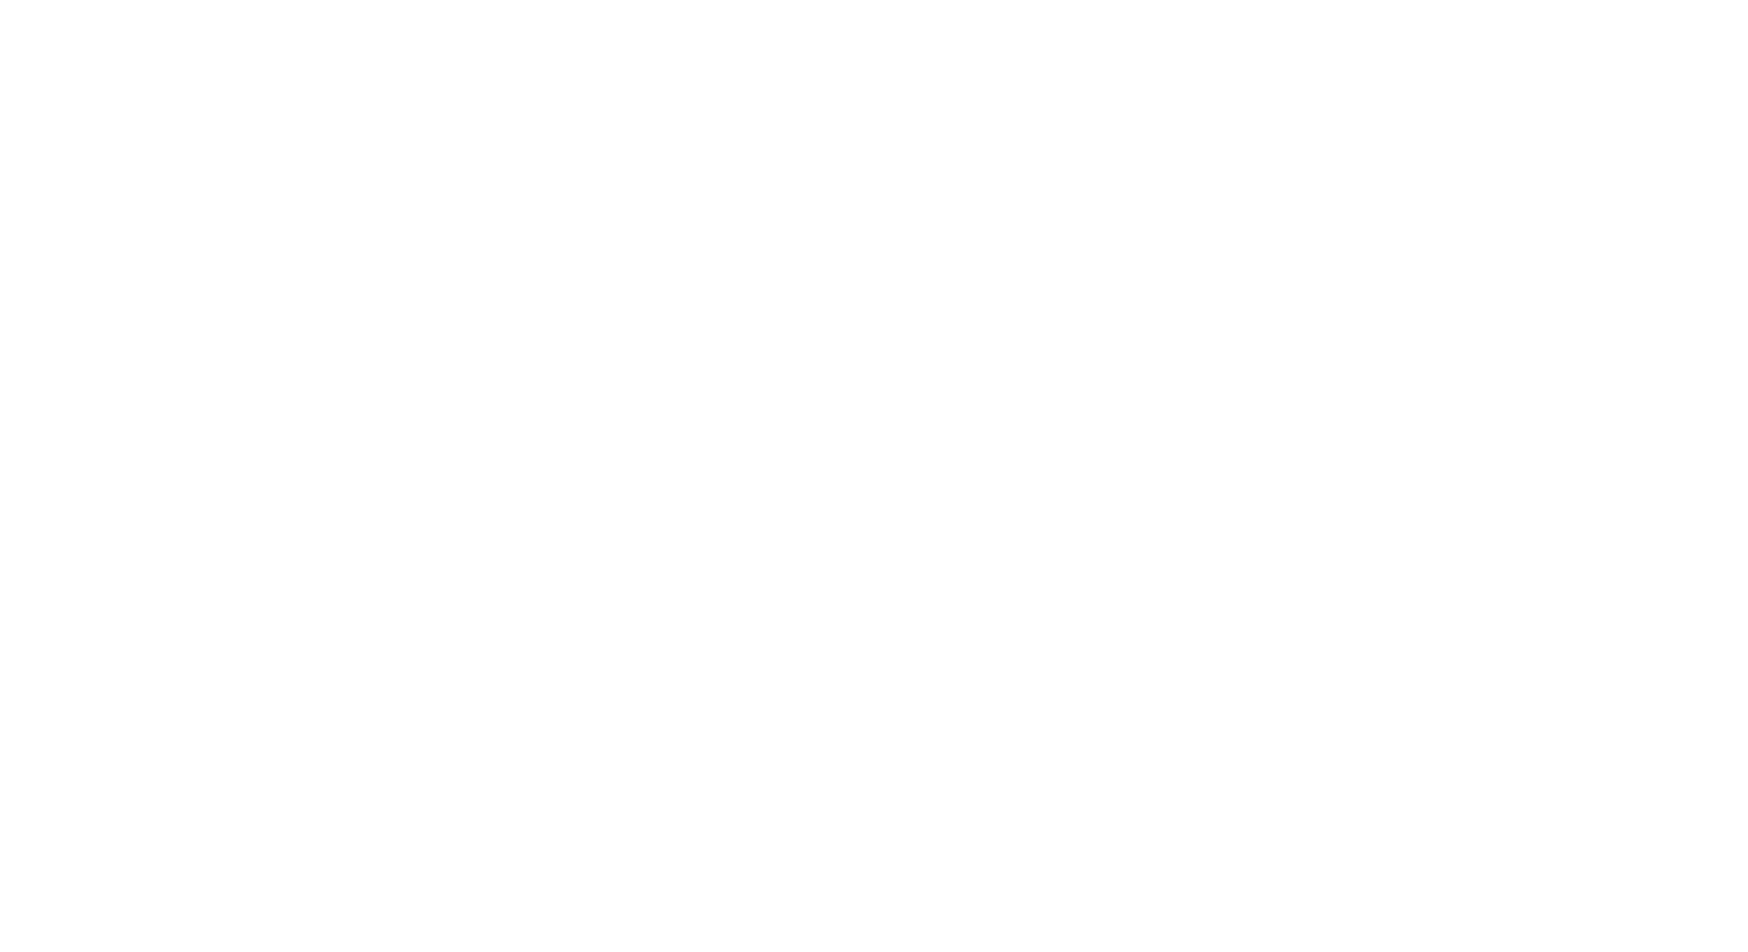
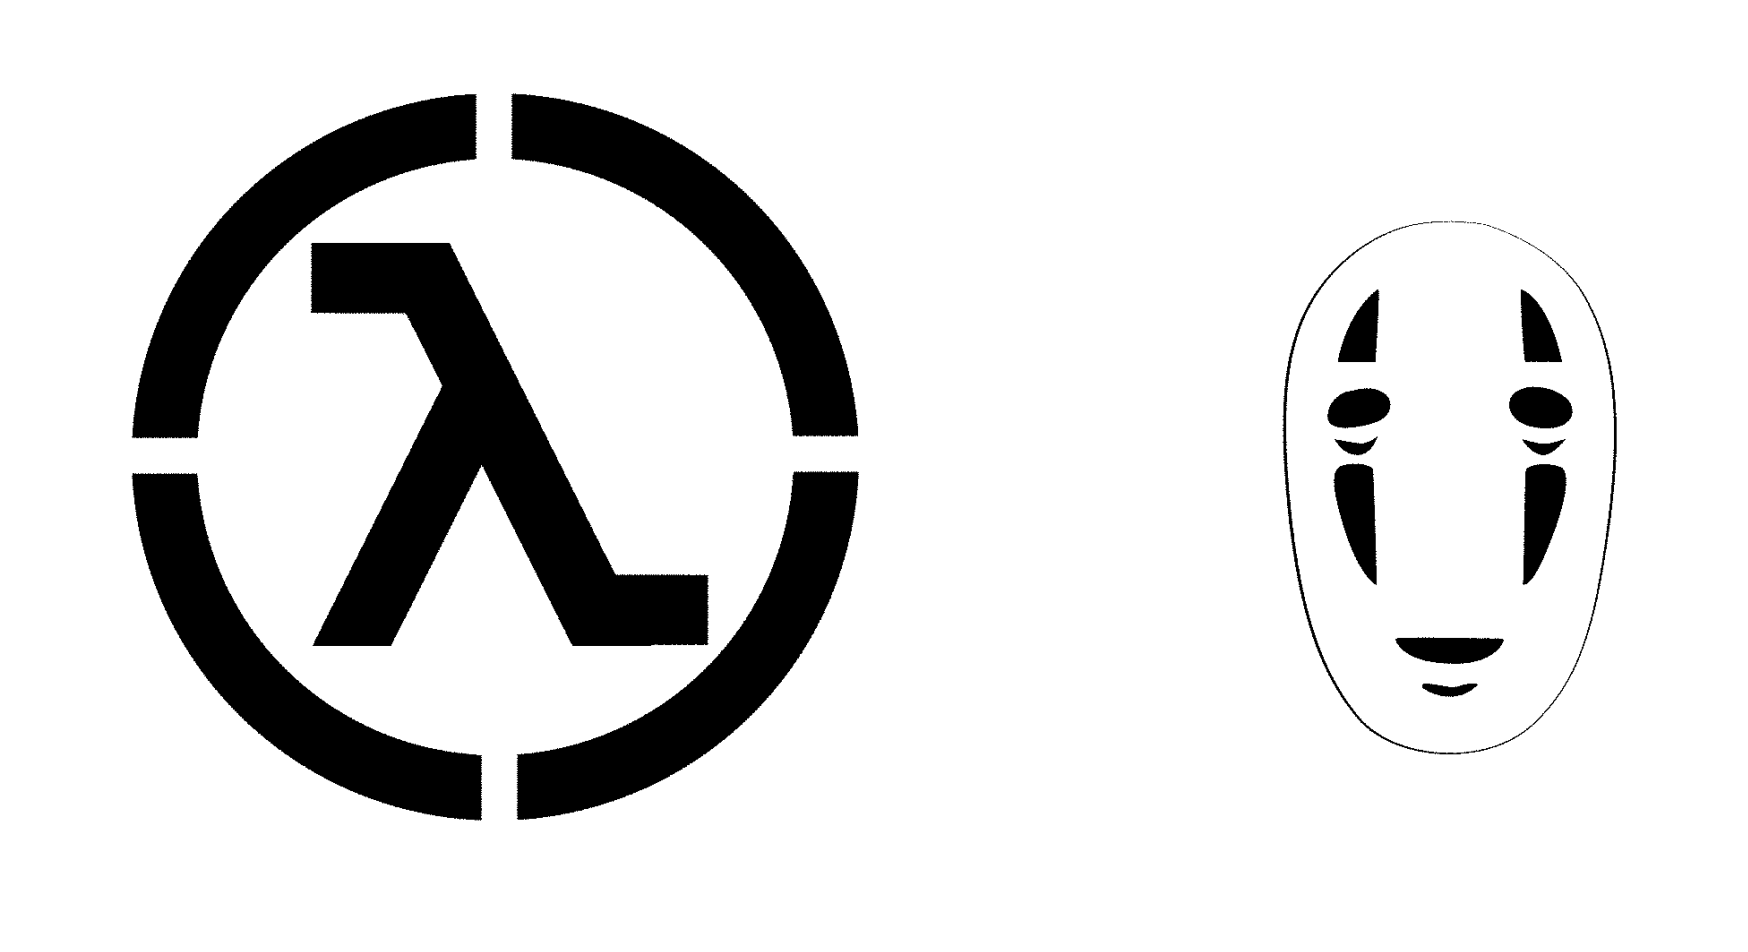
drawing: none -> [131, 93, 859, 821]
drawing: none -> [1282, 220, 1617, 755]
drawing: none -> [1395, 637, 1504, 698]

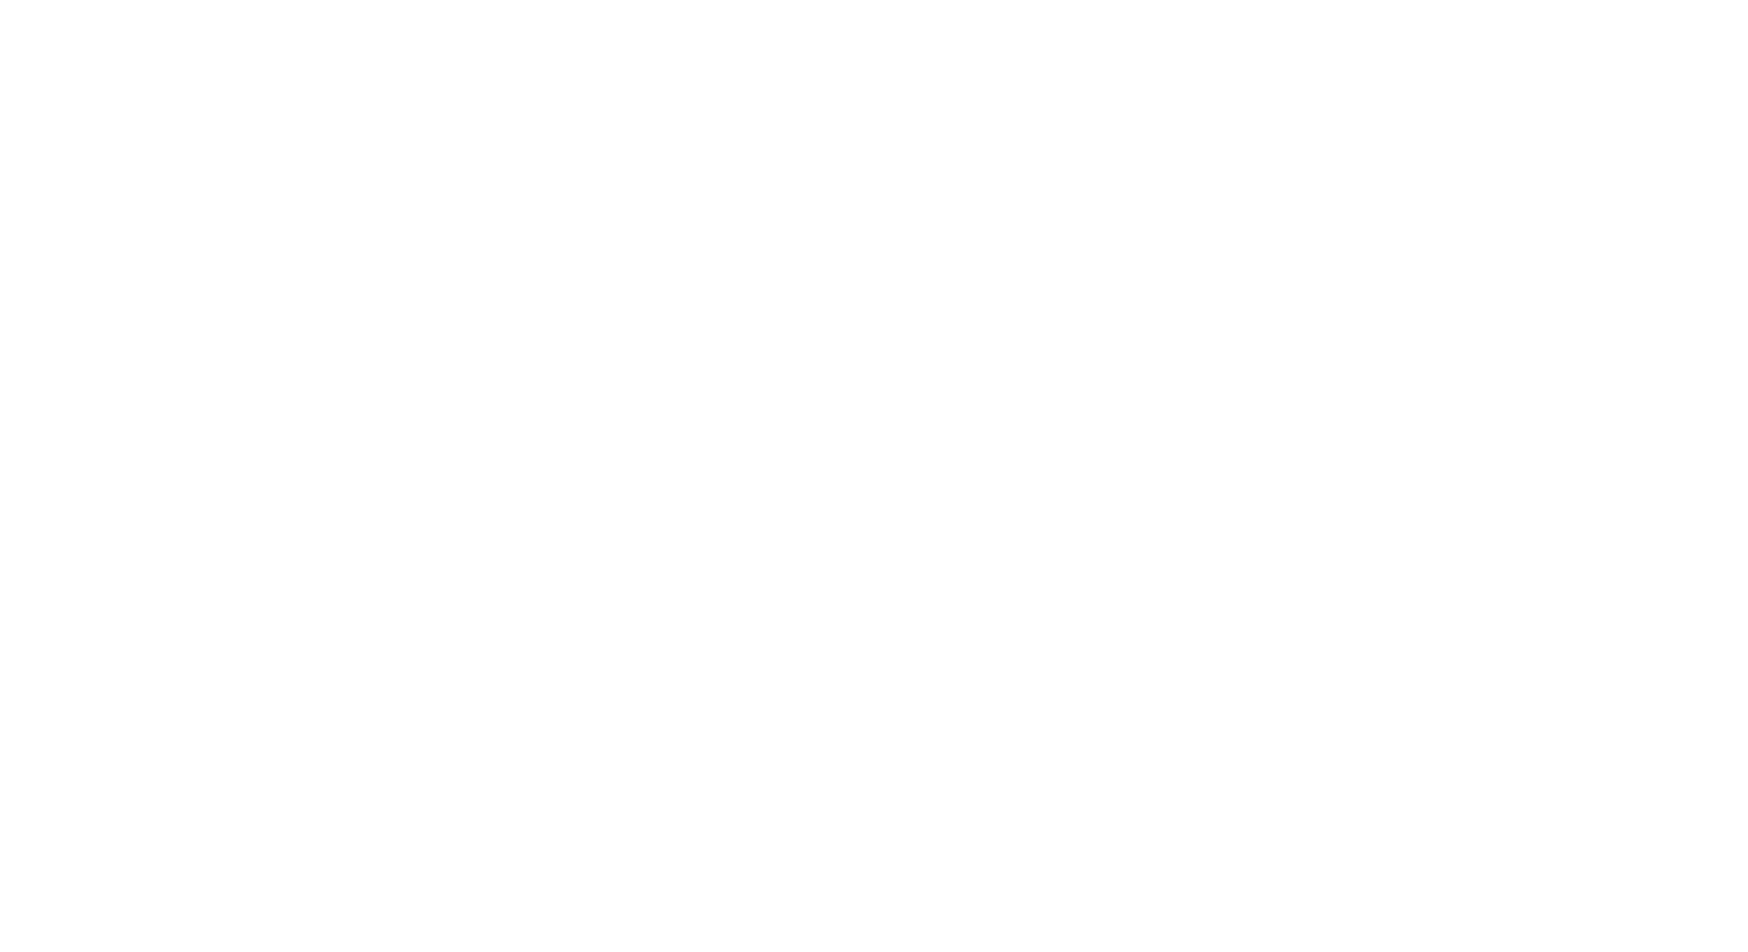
drawing: [131, 93, 859, 821] -> none
drawing: [1282, 220, 1617, 755] -> none
drawing: [1395, 637, 1504, 698] -> none

